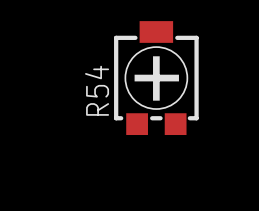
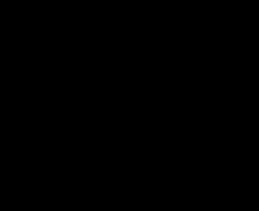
R54: (156, 78) -> none

